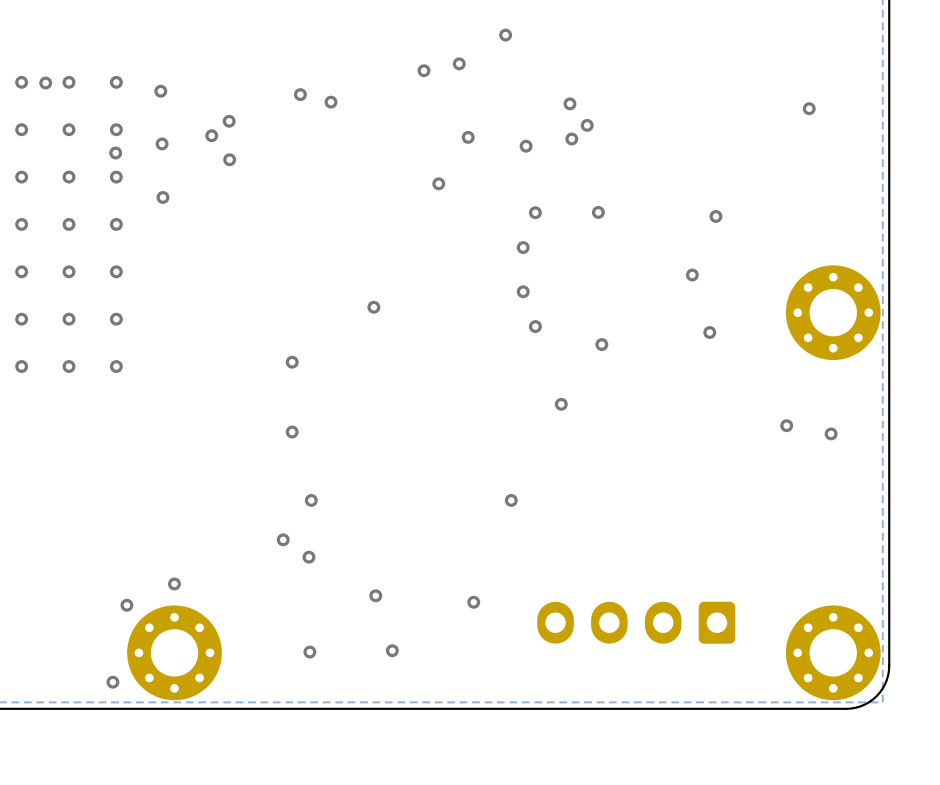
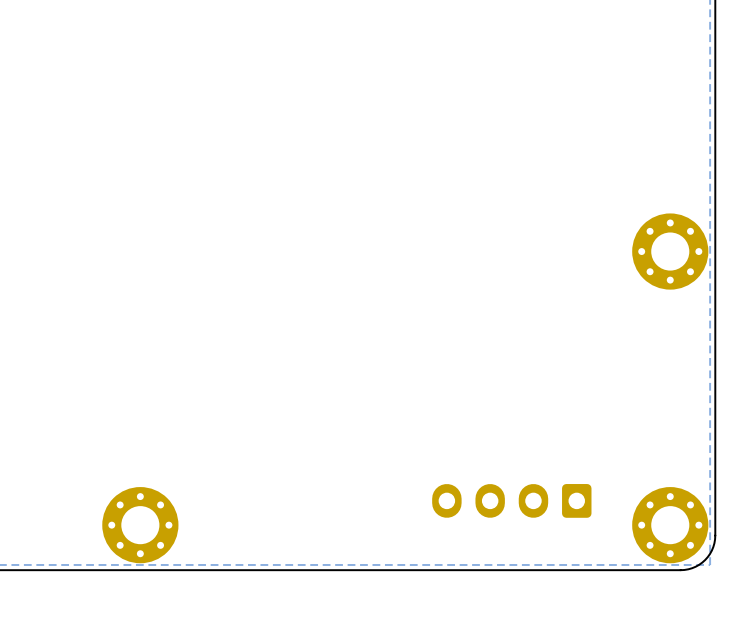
via: (505, 35) -> none
via: (459, 63) -> none
via: (424, 70) -> none
via: (21, 82) -> none
via: (45, 82) -> none
via: (69, 82) -> none
via: (116, 82) -> none
via: (160, 91) -> none
via: (300, 94) -> none
via: (331, 102) -> none
via: (569, 103) -> none
via: (809, 108) -> none
via: (229, 121) -> none
via: (587, 125) -> none
via: (21, 129) -> none
via: (69, 129) -> none
via: (116, 129) -> none
via: (211, 135) -> none
via: (468, 137) -> none
via: (571, 138) -> none
via: (162, 143) -> none
via: (526, 146) -> none
via: (115, 153) -> none
via: (229, 159) -> none
via: (21, 177) -> none
via: (69, 177) -> none
via: (116, 177) -> none
via: (438, 183) -> none
via: (162, 197) -> none
via: (535, 212) -> none
via: (598, 212) -> none
via: (715, 216) -> none
via: (21, 224) -> none
via: (69, 224) -> none
via: (116, 224) -> none
via: (523, 247) -> none
via: (21, 271) -> none
via: (69, 271) -> none
via: (116, 271) -> none
via: (692, 275) -> none
via: (523, 291) -> none
via: (373, 307) -> none
via: (21, 319) -> none
via: (69, 319) -> none
via: (116, 319) -> none
via: (535, 326) -> none
via: (709, 332) -> none
via: (601, 344) -> none
via: (292, 362) -> none
via: (21, 366) -> none
via: (69, 366) -> none
via: (116, 366) -> none
via: (561, 404) -> none
via: (786, 425) -> none
via: (292, 432) -> none
via: (831, 433) -> none
via: (311, 500) -> none
via: (511, 500) -> none
via: (283, 539) -> none
via: (308, 557) -> none
via: (174, 583) -> none
via: (375, 595) -> none
via: (473, 602) -> none
via: (126, 605) -> none
via: (392, 650) -> none
via: (309, 652) -> none
via: (112, 682) -> none

